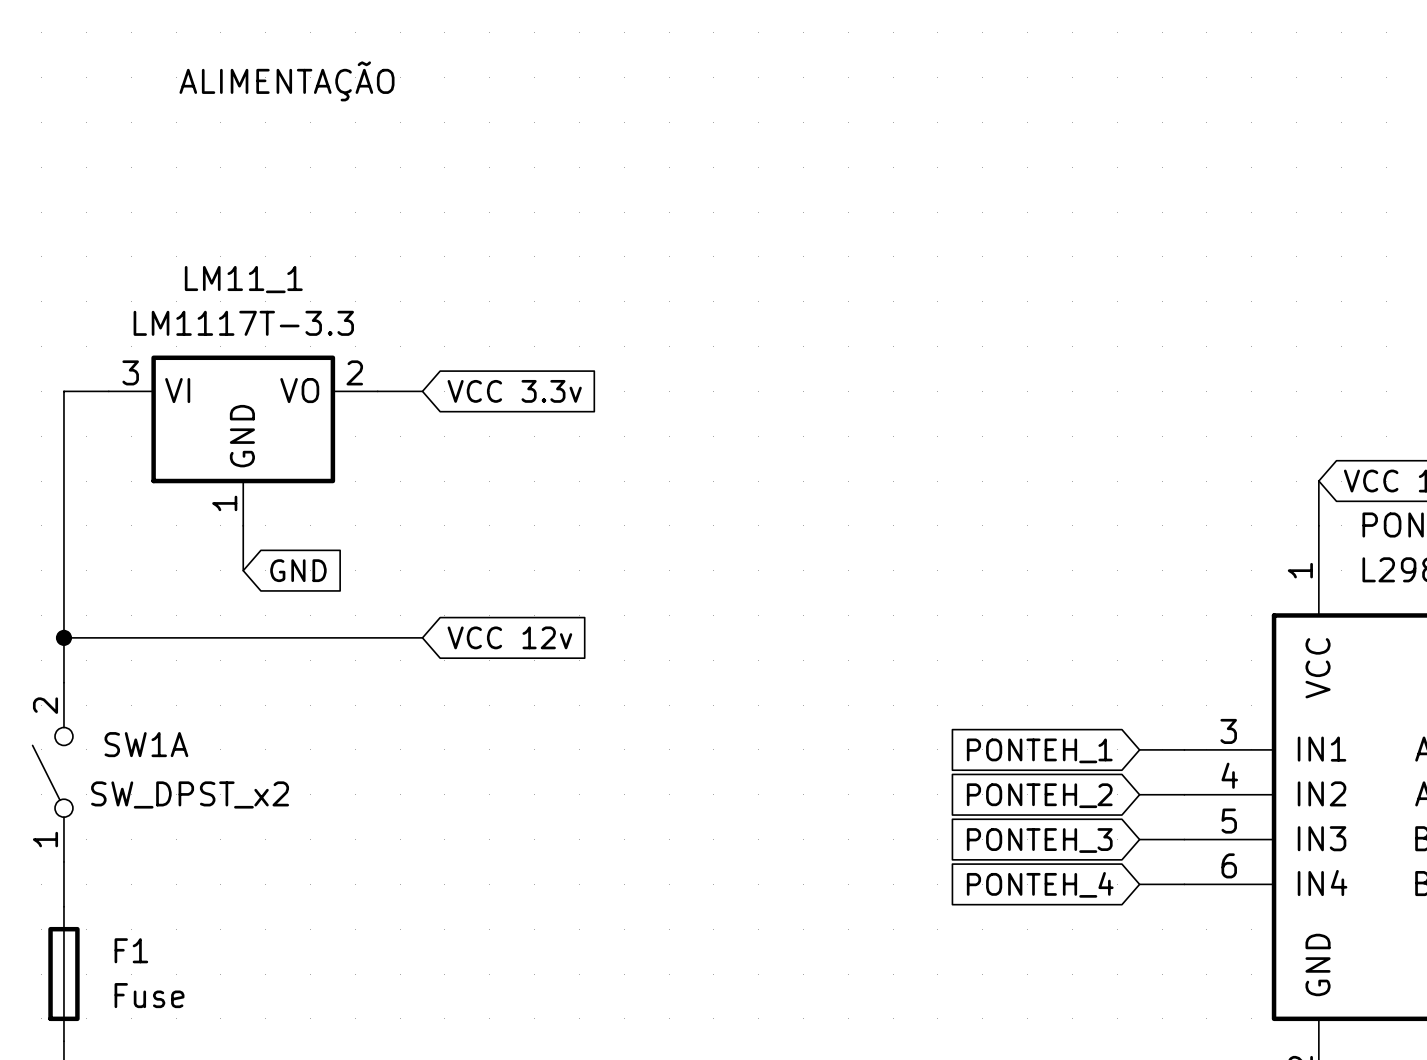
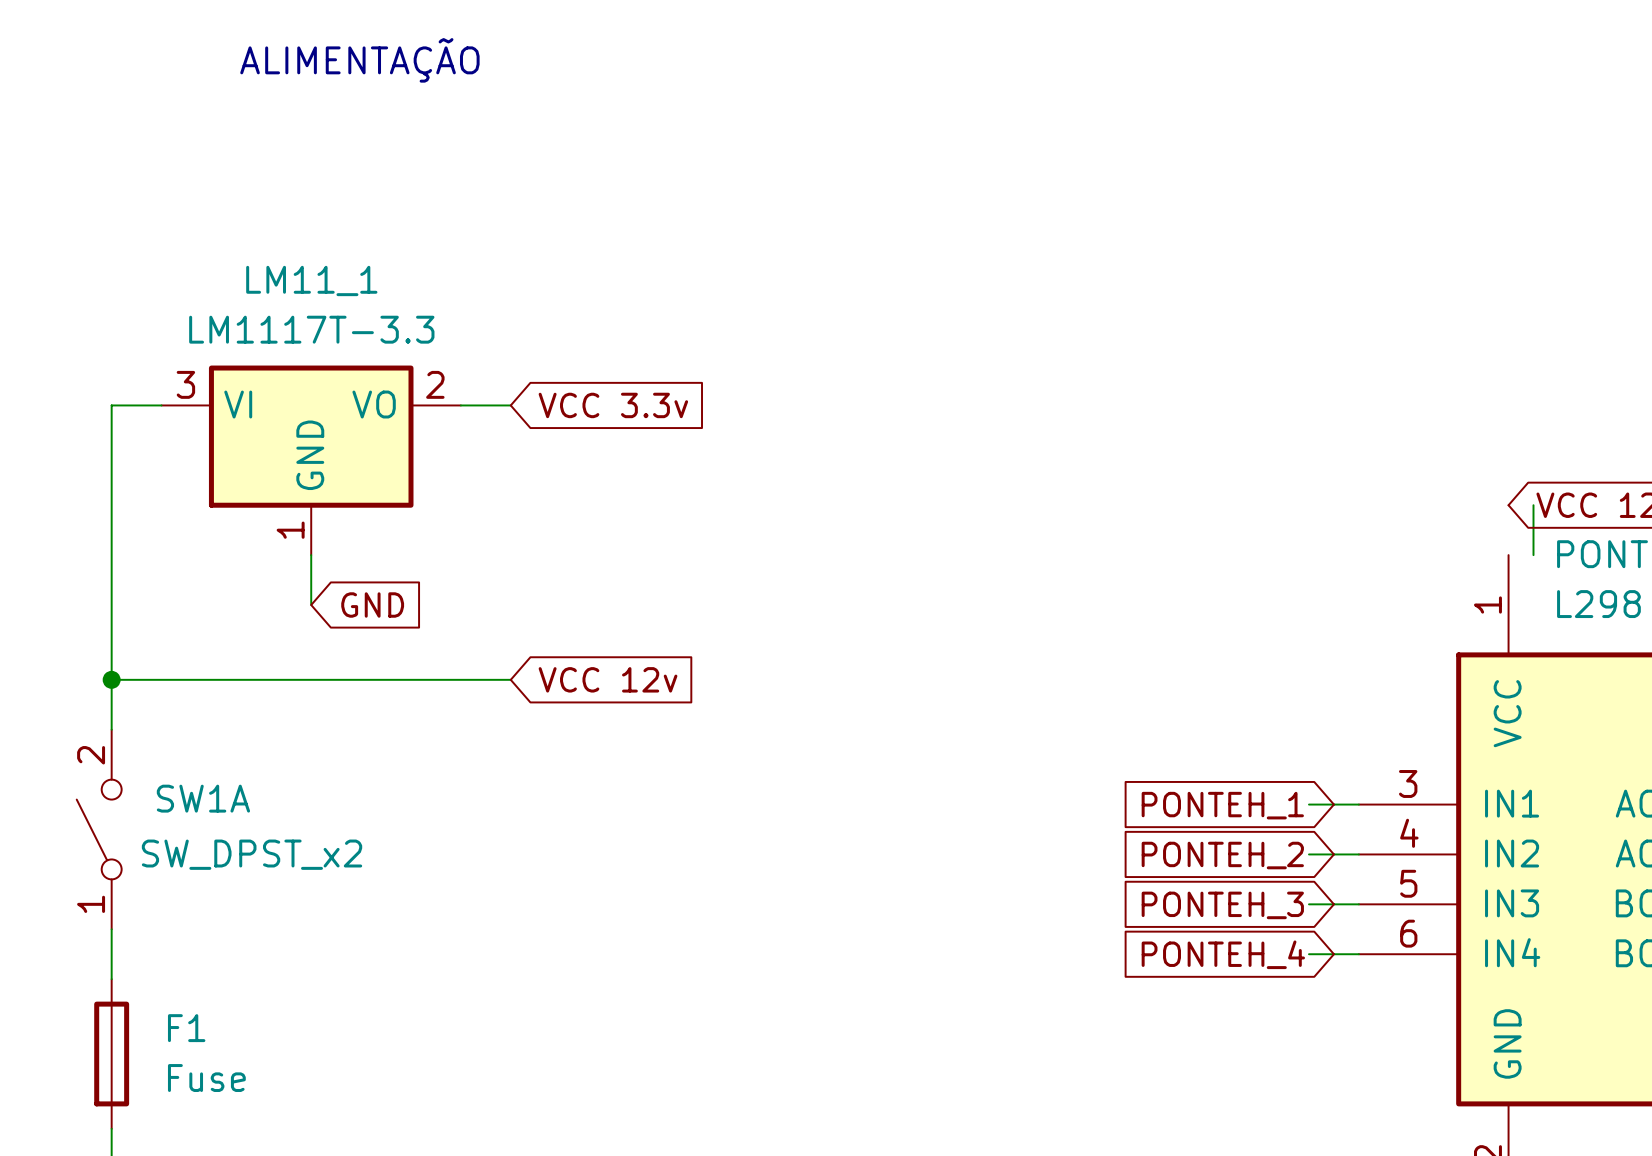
wire: (1318, 481) (1318, 525) -> (1533, 505) (1533, 555)
global label position: PONTEH_1 (1039, 750) -> PONTEH_1 (1222, 805)
global label position: PONTEH_2 (1039, 795) -> PONTEH_2 (1222, 855)
global label position: PONTEH_3 (1039, 840) -> PONTEH_3 (1222, 905)
global label position: PONTEH_4 (1040, 884) -> PONTEH_4 (1223, 954)

